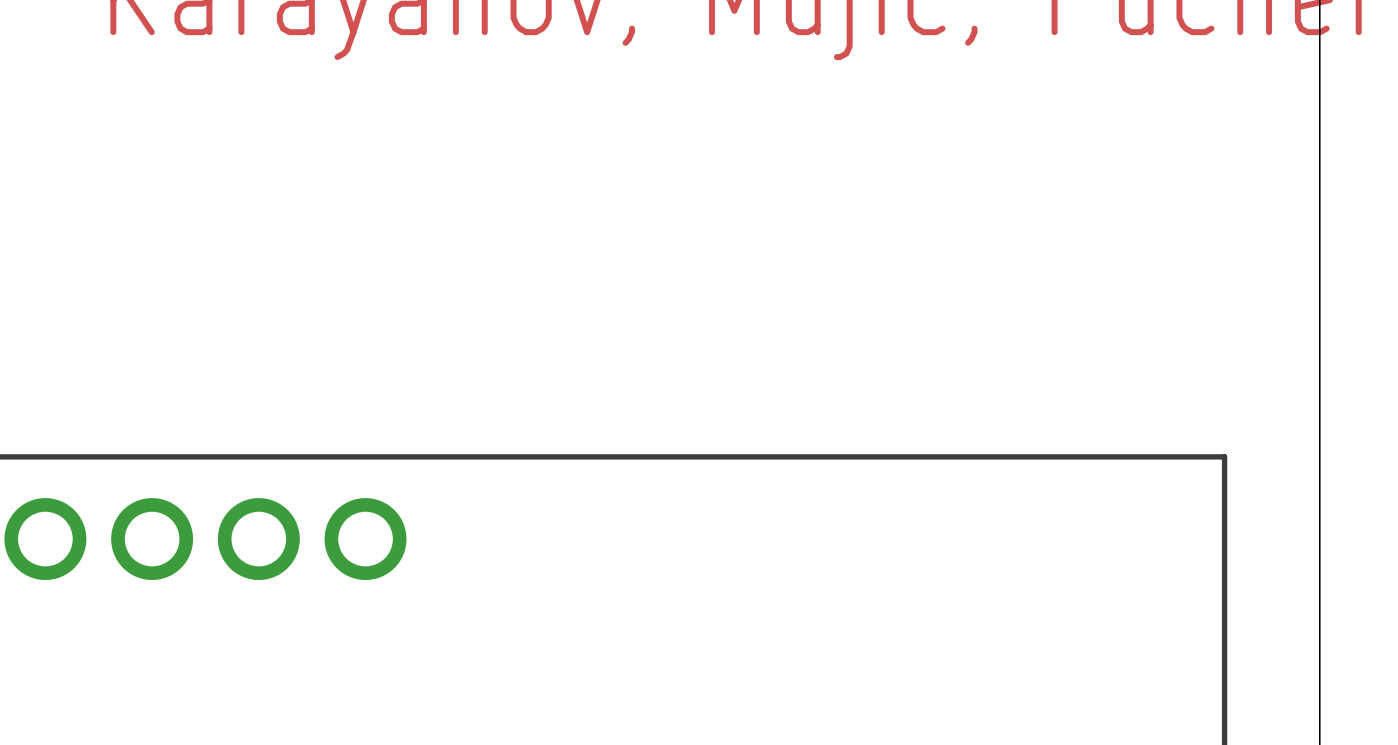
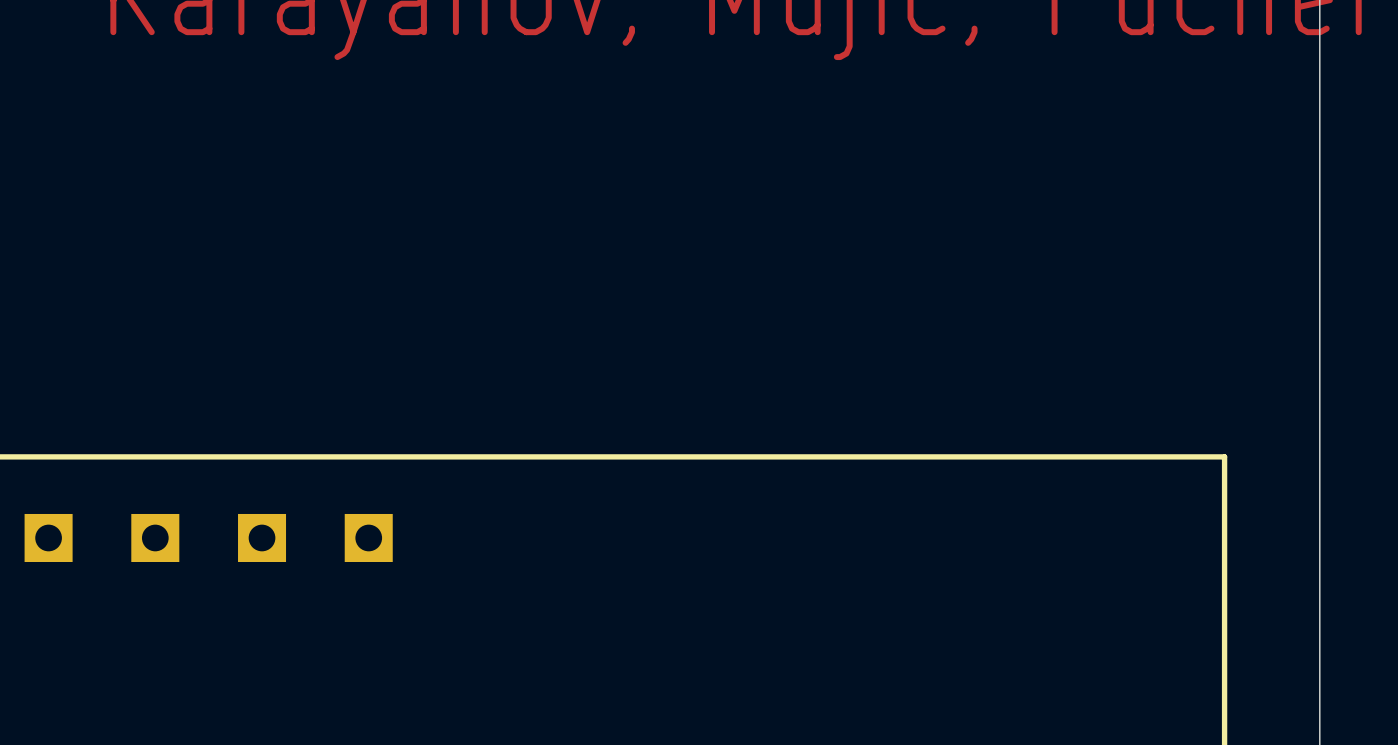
via: (45, 539) -> none
via: (152, 539) -> none
via: (258, 539) -> none
via: (365, 539) -> none

